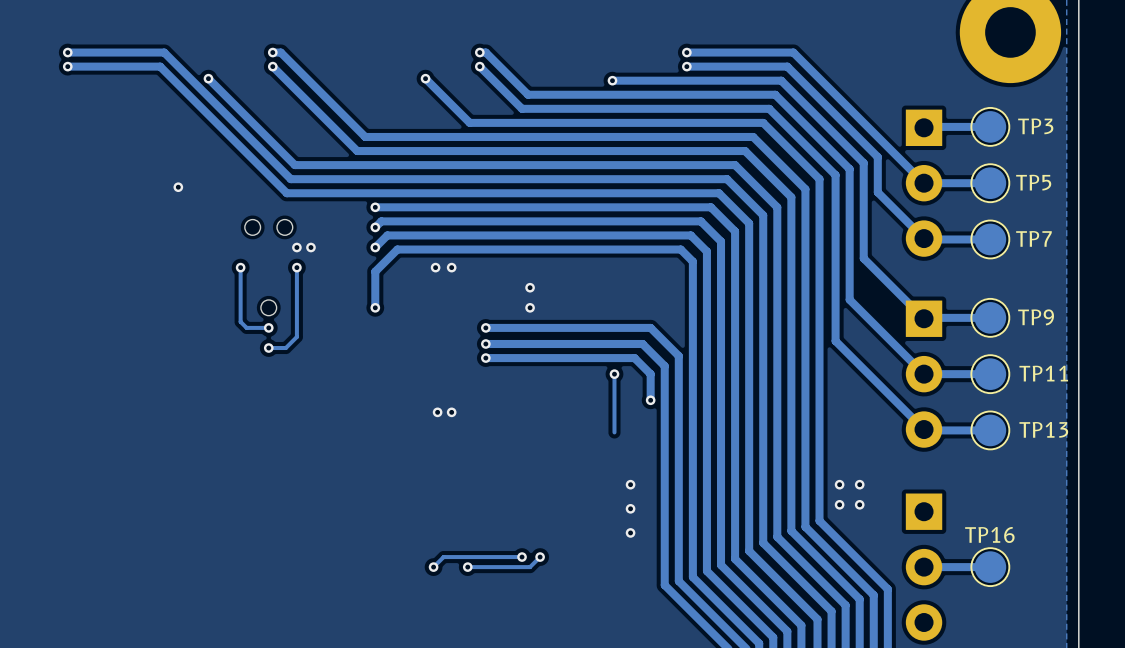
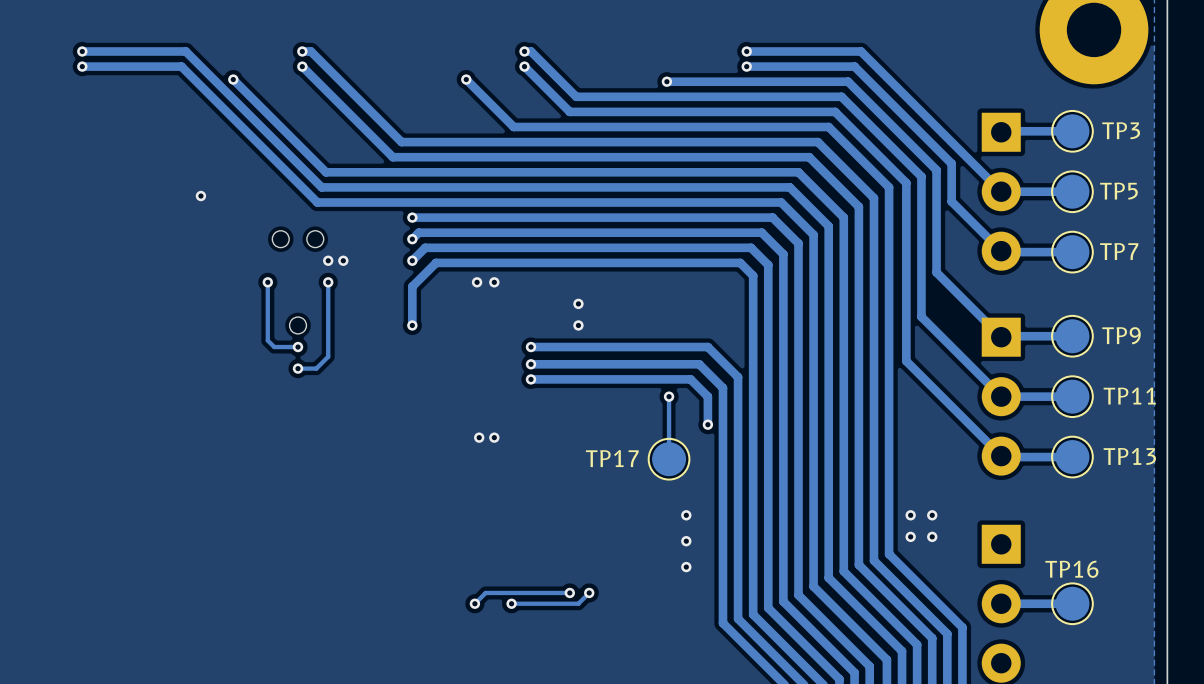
TP17: none -> (669, 459)

